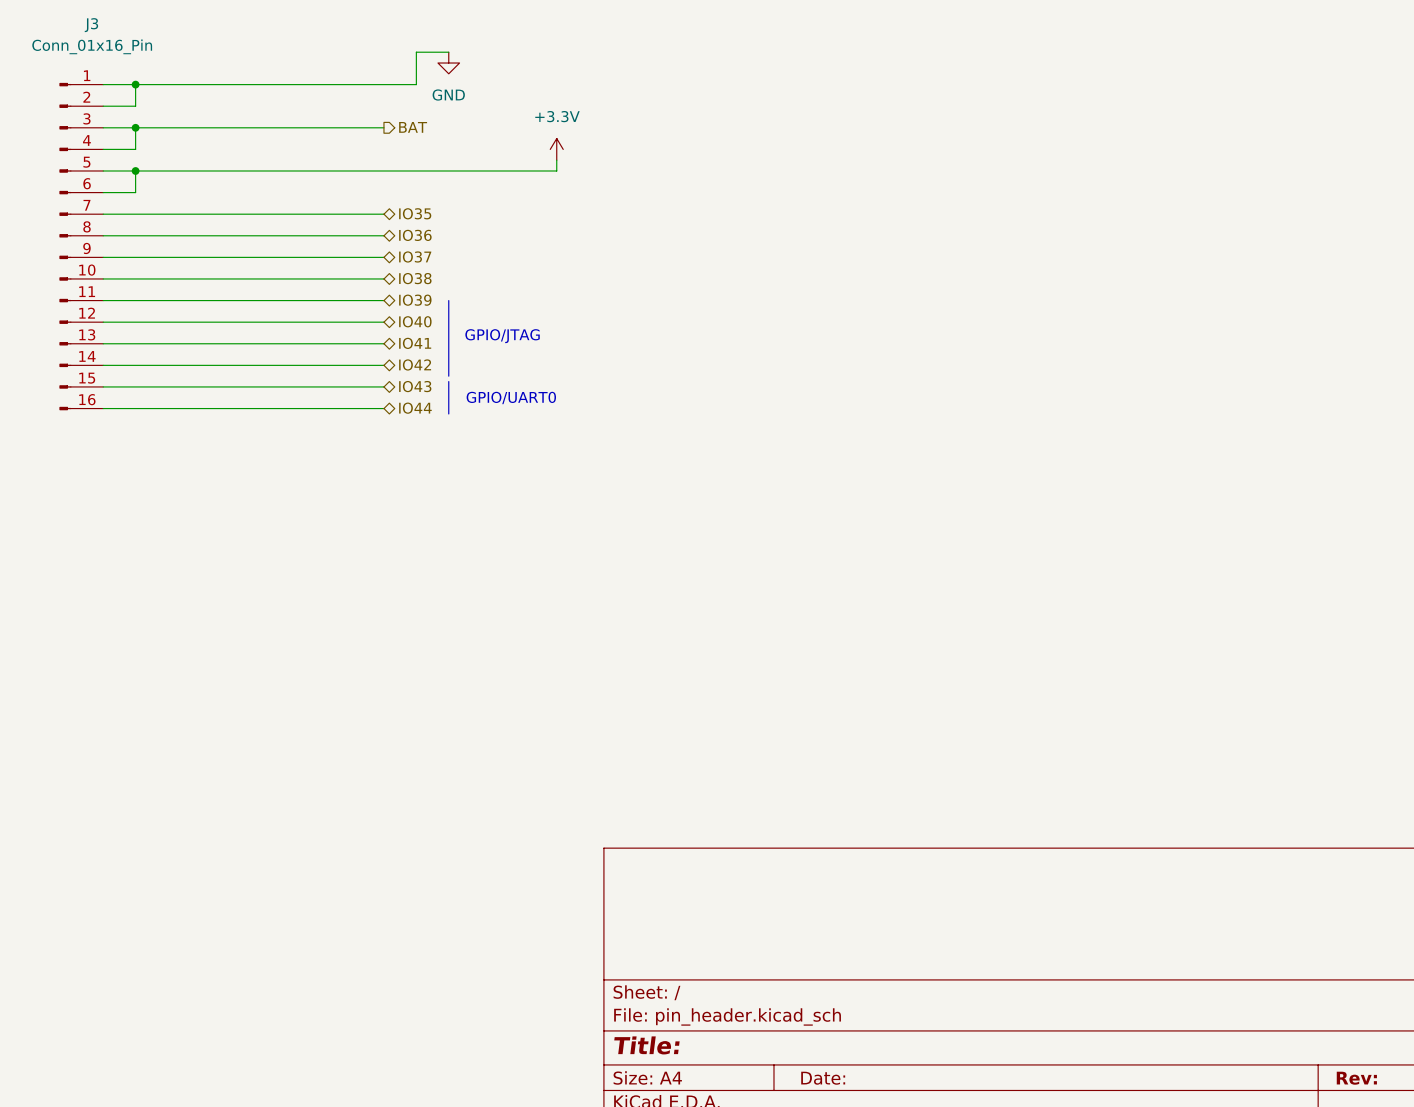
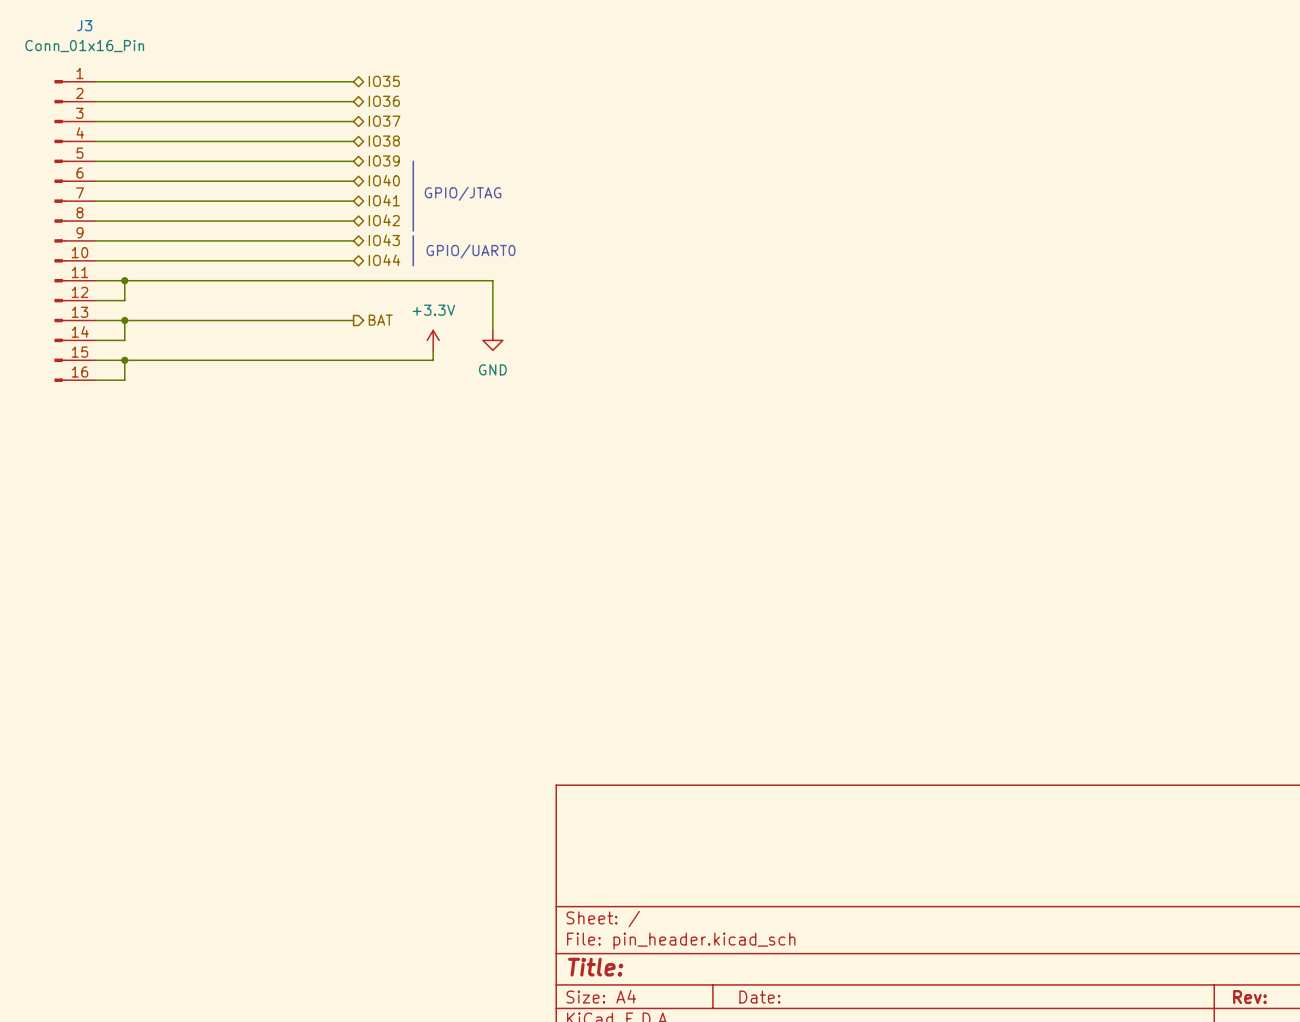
wire: (448, 52) (416, 52) (416, 84) (383, 84) -> none
power symbol: GND (448, 63) -> none
wire: (135, 84) (135, 106) -> (353, 101) (124, 101)
junction: (135, 84) -> none
hierarchical label: none -> IO35 (384, 81)
hierarchical label: none -> IO36 (384, 101)
wire: (135, 127) (135, 149) -> (353, 141) (124, 141)
junction: (135, 127) -> none
hierarchical label shape: output (413, 127) -> bidirectional (384, 121)
hierarchical label: BAT (413, 127) -> IO37 (384, 121)
hierarchical label: none -> IO38 (384, 141)
power symbol: +3.3V (556, 149) -> none
wire: (556, 160) (556, 170) (383, 170) -> none
wire: (135, 170) (135, 192) -> (353, 181) (124, 181)
junction: (135, 170) -> none
hierarchical label: IO35 (415, 213) -> IO41 (384, 200)
hierarchical label: IO36 (415, 235) -> IO42 (384, 220)
hierarchical label: IO37 (415, 256) -> IO43 (384, 240)
hierarchical label: IO38 (415, 278) -> IO44 (384, 260)
junction: none -> (124, 280)
wire: none -> (353, 280) (492, 280) (492, 330)
hierarchical label position: IO39 (415, 300) -> IO39 (384, 160)
line: (448, 300) (448, 376) -> (413, 161) (413, 230)
hierarchical label position: IO40 (415, 321) -> IO40 (384, 180)
wire: (135, 322) (383, 322) -> (124, 300) (124, 280)
text position: GPIO/JTAG (502, 336) -> GPIO/JTAG (463, 193)
junction: none -> (124, 320)
hierarchical label shape: bidirectional (415, 343) -> output (380, 320)
hierarchical label: IO41 (415, 343) -> BAT (380, 320)
hierarchical label: IO42 (415, 364) -> none
wire: (135, 365) (383, 365) -> (124, 340) (124, 320)
power symbol: none -> +3.3V (433, 340)
power symbol: none -> GND (492, 340)
wire: none -> (433, 350) (433, 360) (353, 360)
line: (448, 381) (448, 413) -> (413, 235) (413, 265)
junction: none -> (124, 360)
hierarchical label: IO43 (415, 386) -> none
text position: GPIO/UART0 (511, 397) -> GPIO/UART0 (470, 251)
wire: (135, 408) (383, 408) -> (124, 380) (124, 360)
hierarchical label: IO44 (415, 408) -> none

